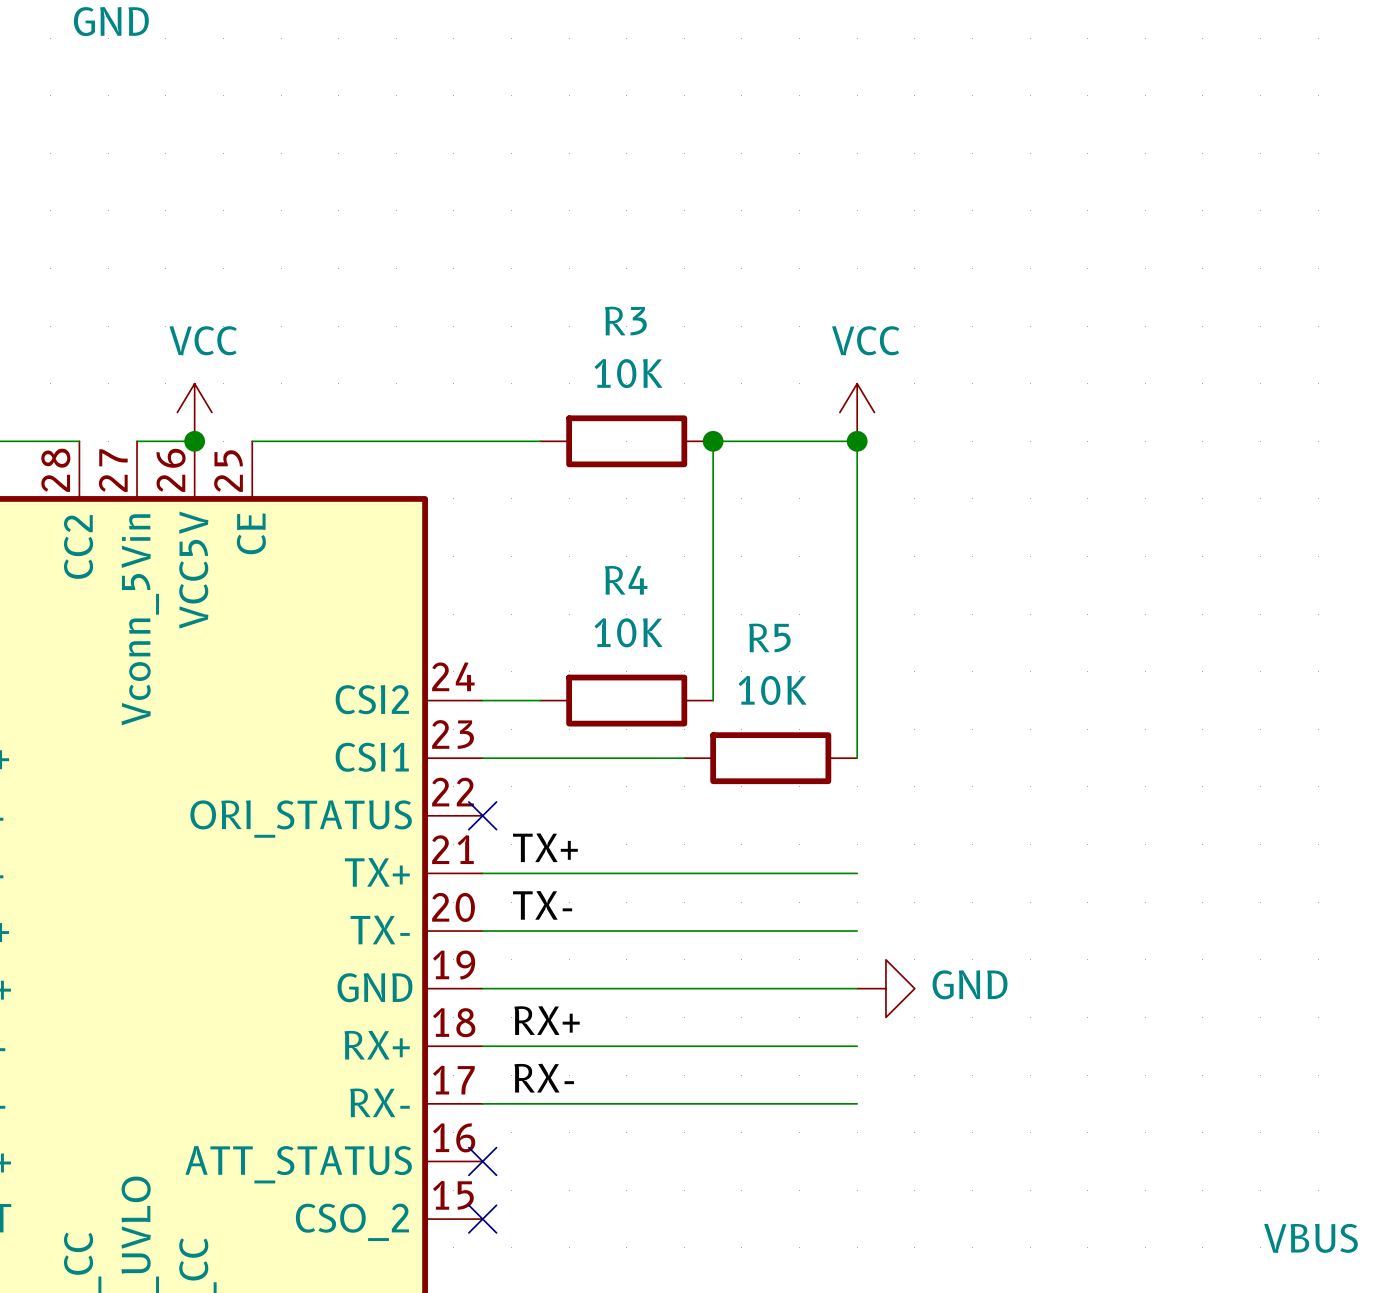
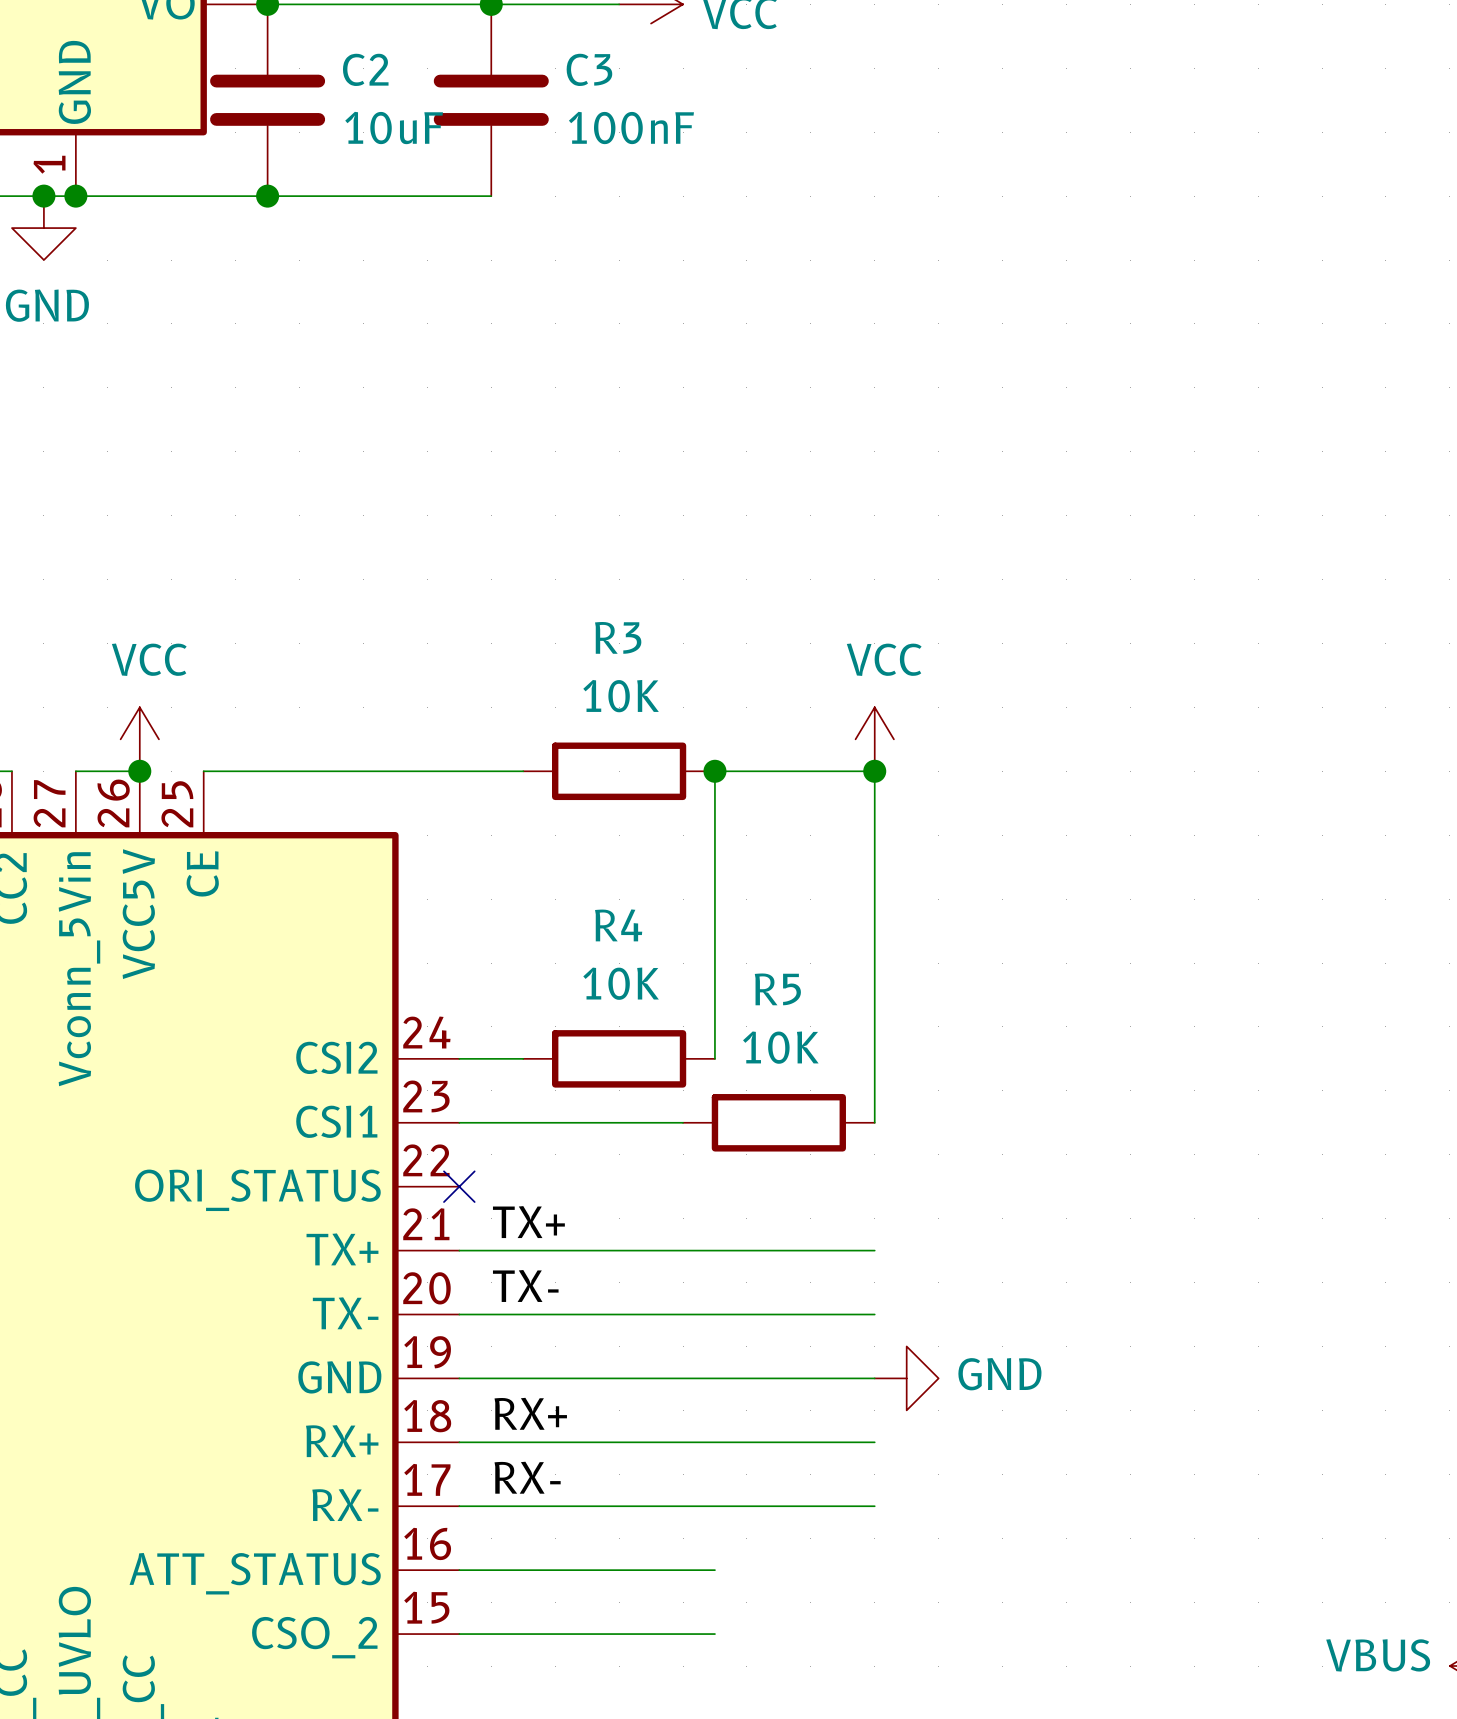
wire: none -> (459, 1570) (714, 1570)
no-connect mark: (482, 1161) -> none
wire: none -> (459, 1634) (714, 1634)
no-connect mark: (482, 1219) -> none

